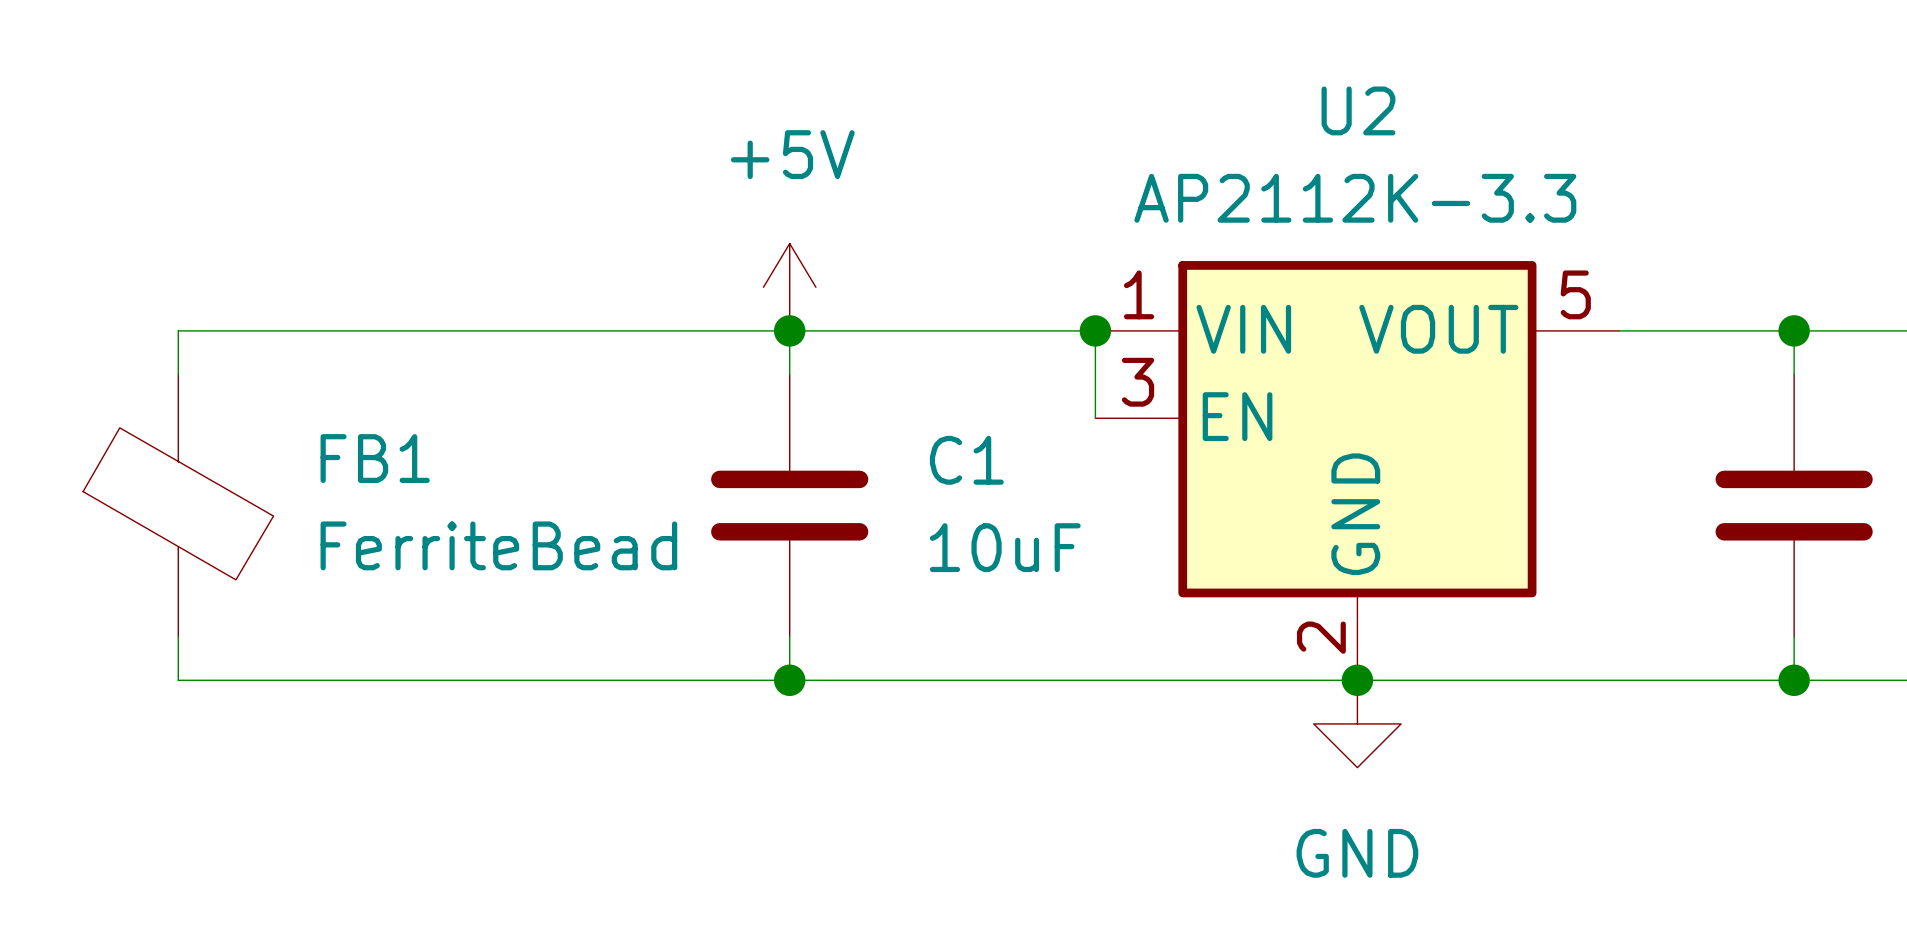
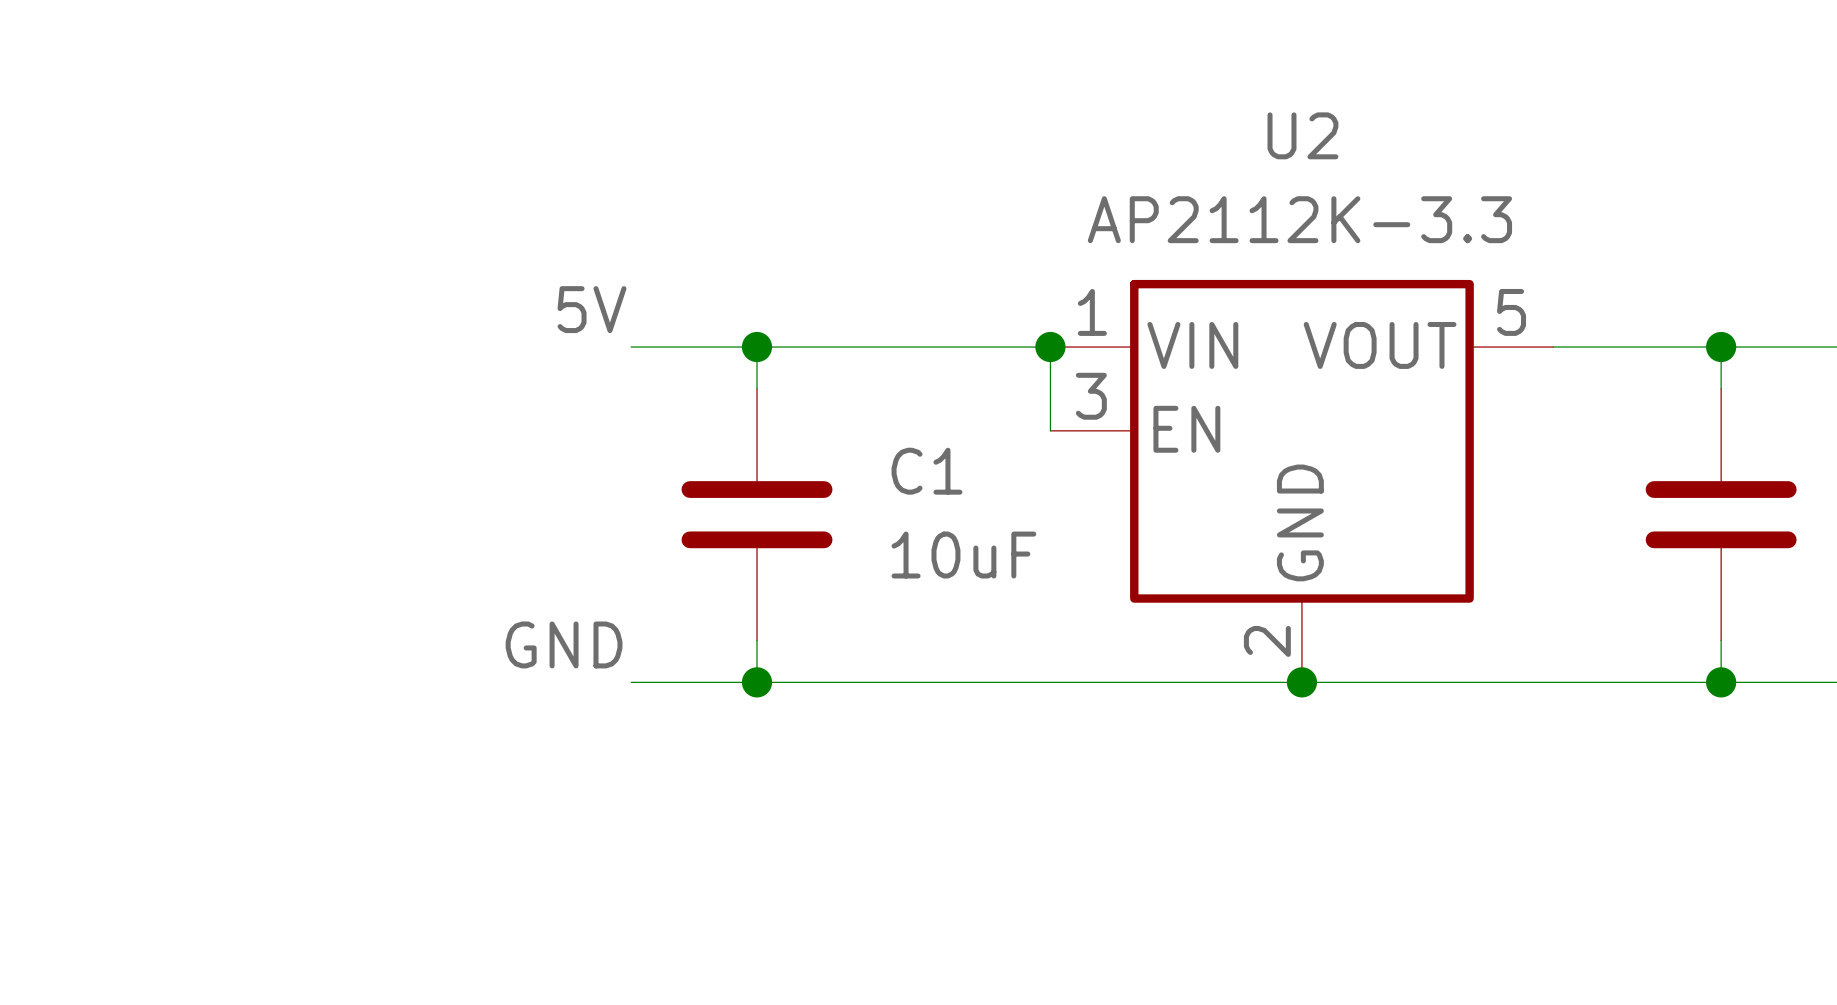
power symbol: +5V (789, 287) -> none
label: none -> 5V (592, 309)
wire: (658, 330) (178, 330) (178, 374) -> none
FB1: FerriteBead (178, 505) -> none
wire: (178, 636) (178, 680) (658, 680) -> none
label: none -> GND (564, 644)
power symbol: GND (1357, 723) -> none

